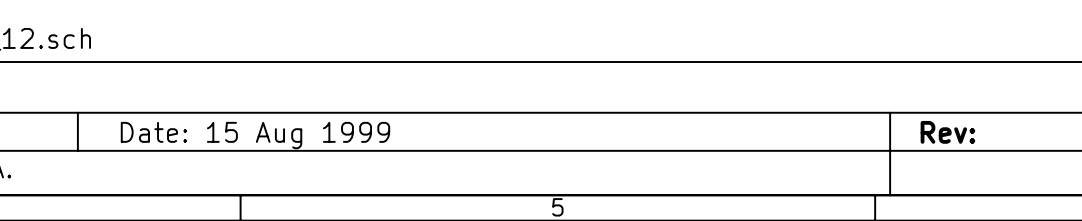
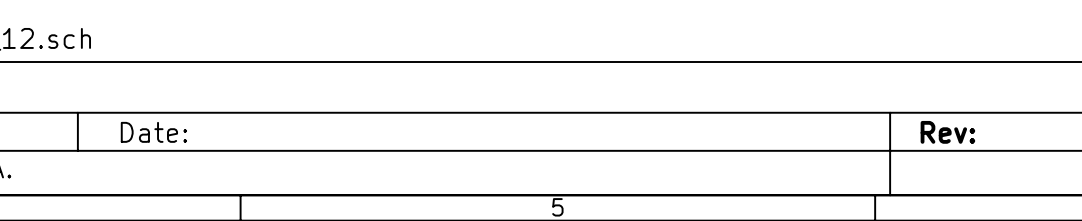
title block: Date: 15 Aug 1999 (255, 135) -> Date: (153, 132)

